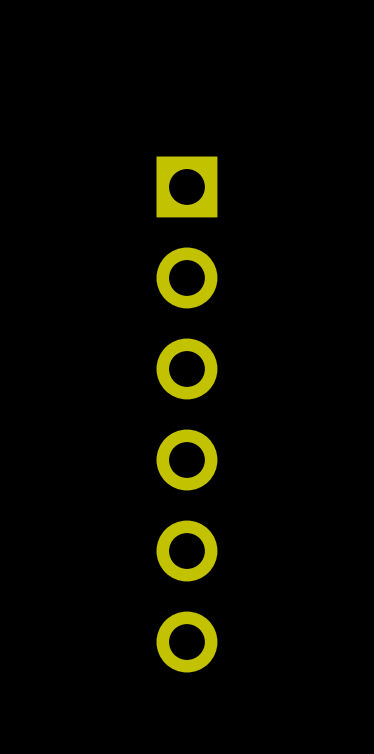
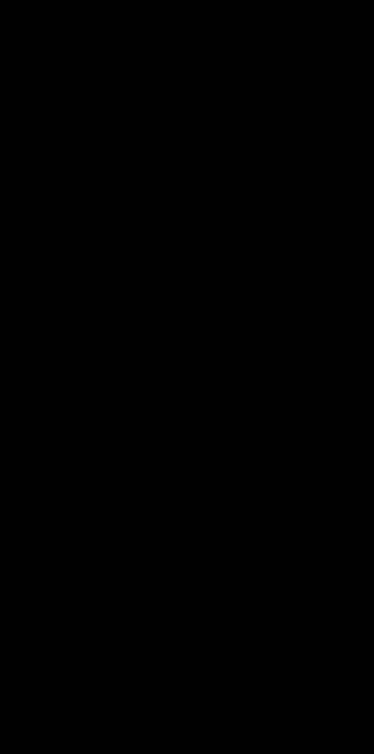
part: (186, 414) -> none

